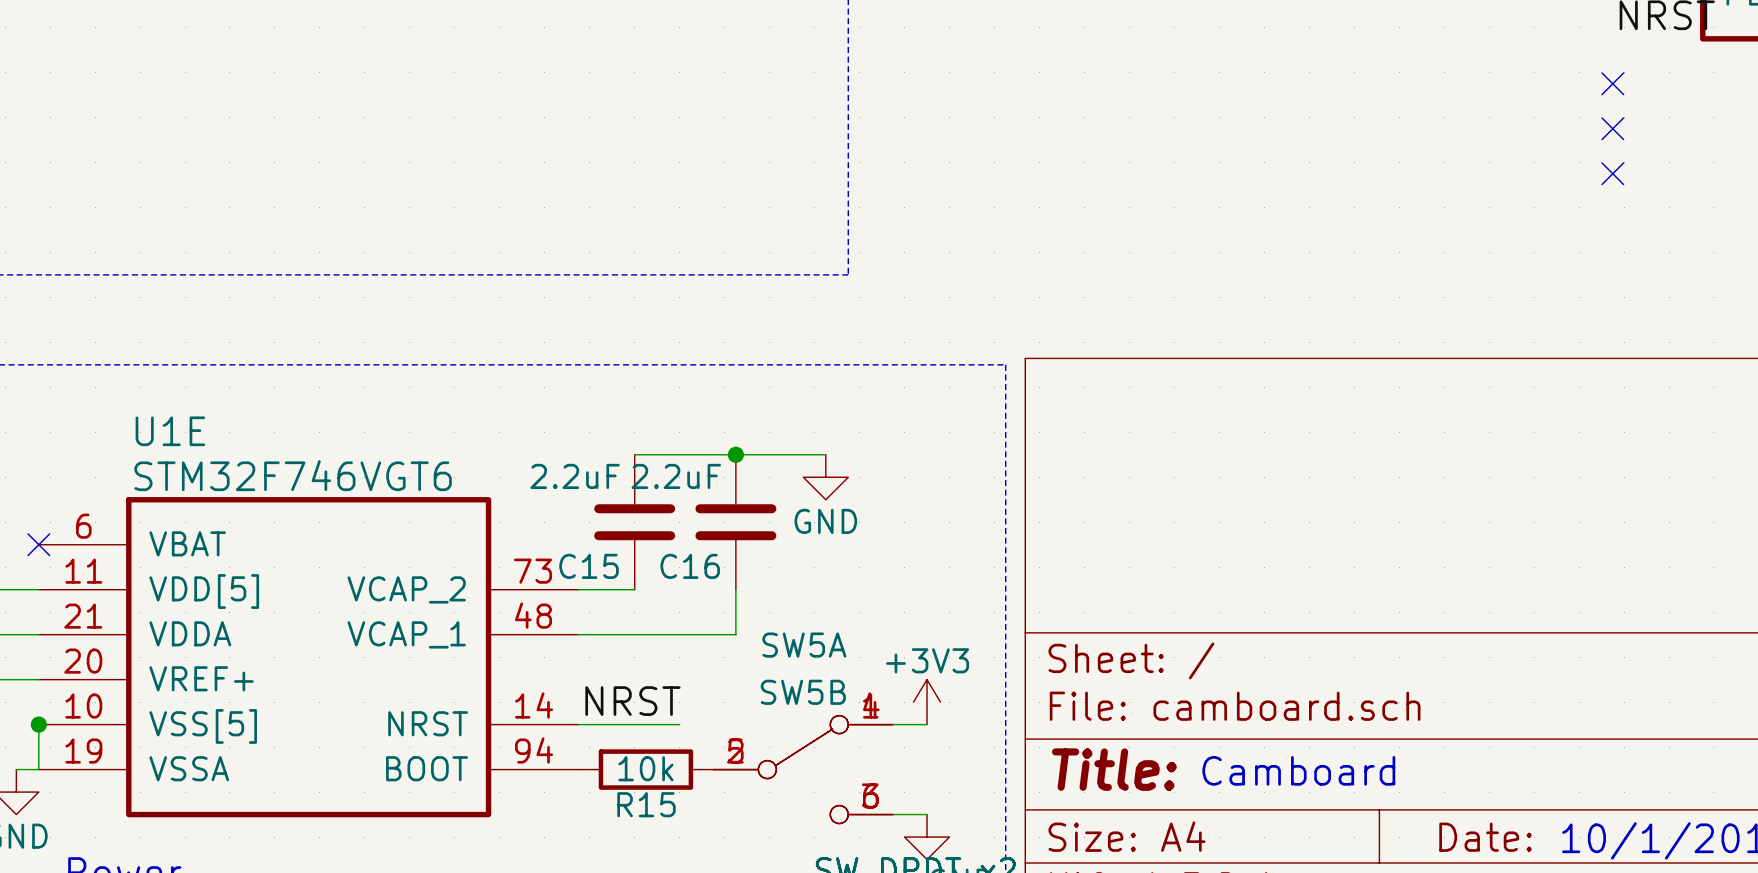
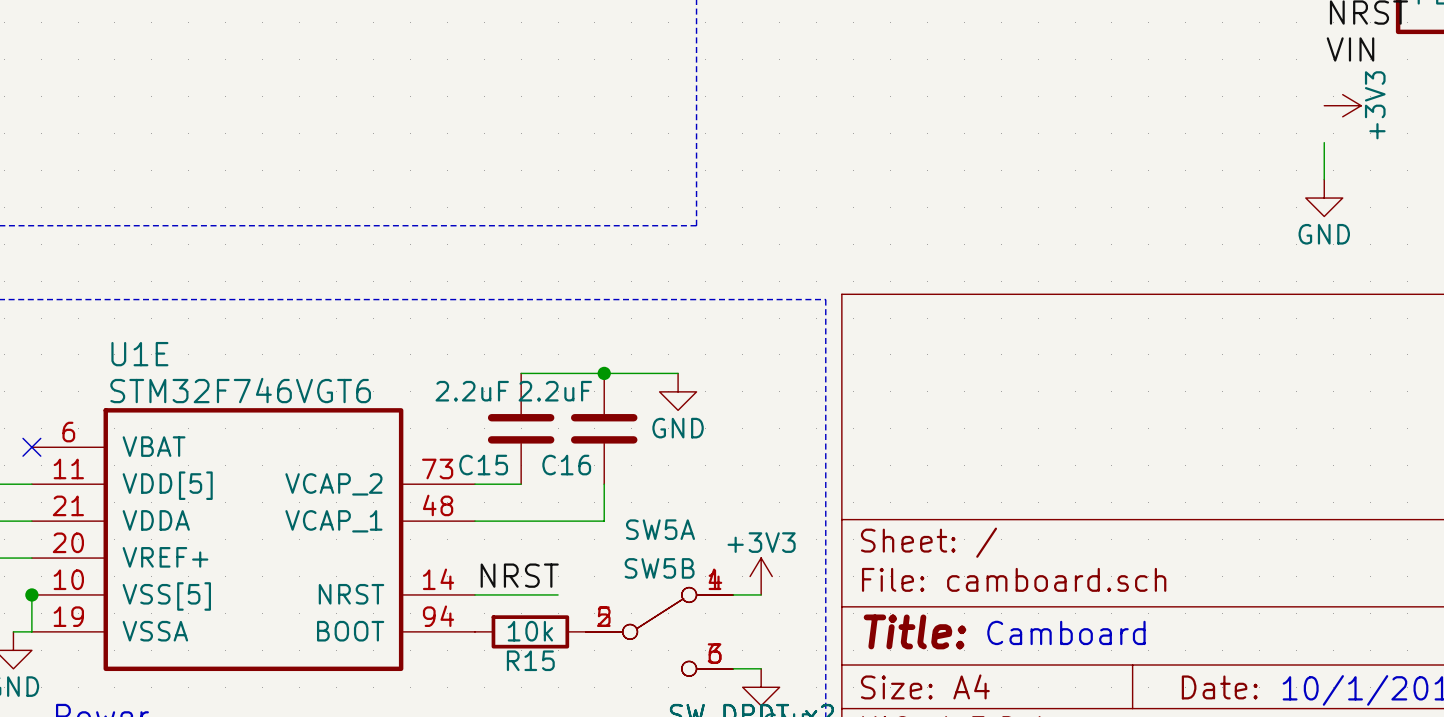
label: none -> VIN (1350, 49)
no-connect mark: (1612, 83) -> none
no-connect mark: (1612, 128) -> none
power symbol: none -> +3V3 (1342, 105)
wire: none -> (1324, 142) (1324, 179)
no-connect mark: (1612, 173) -> none
power symbol: none -> GND (1324, 198)

